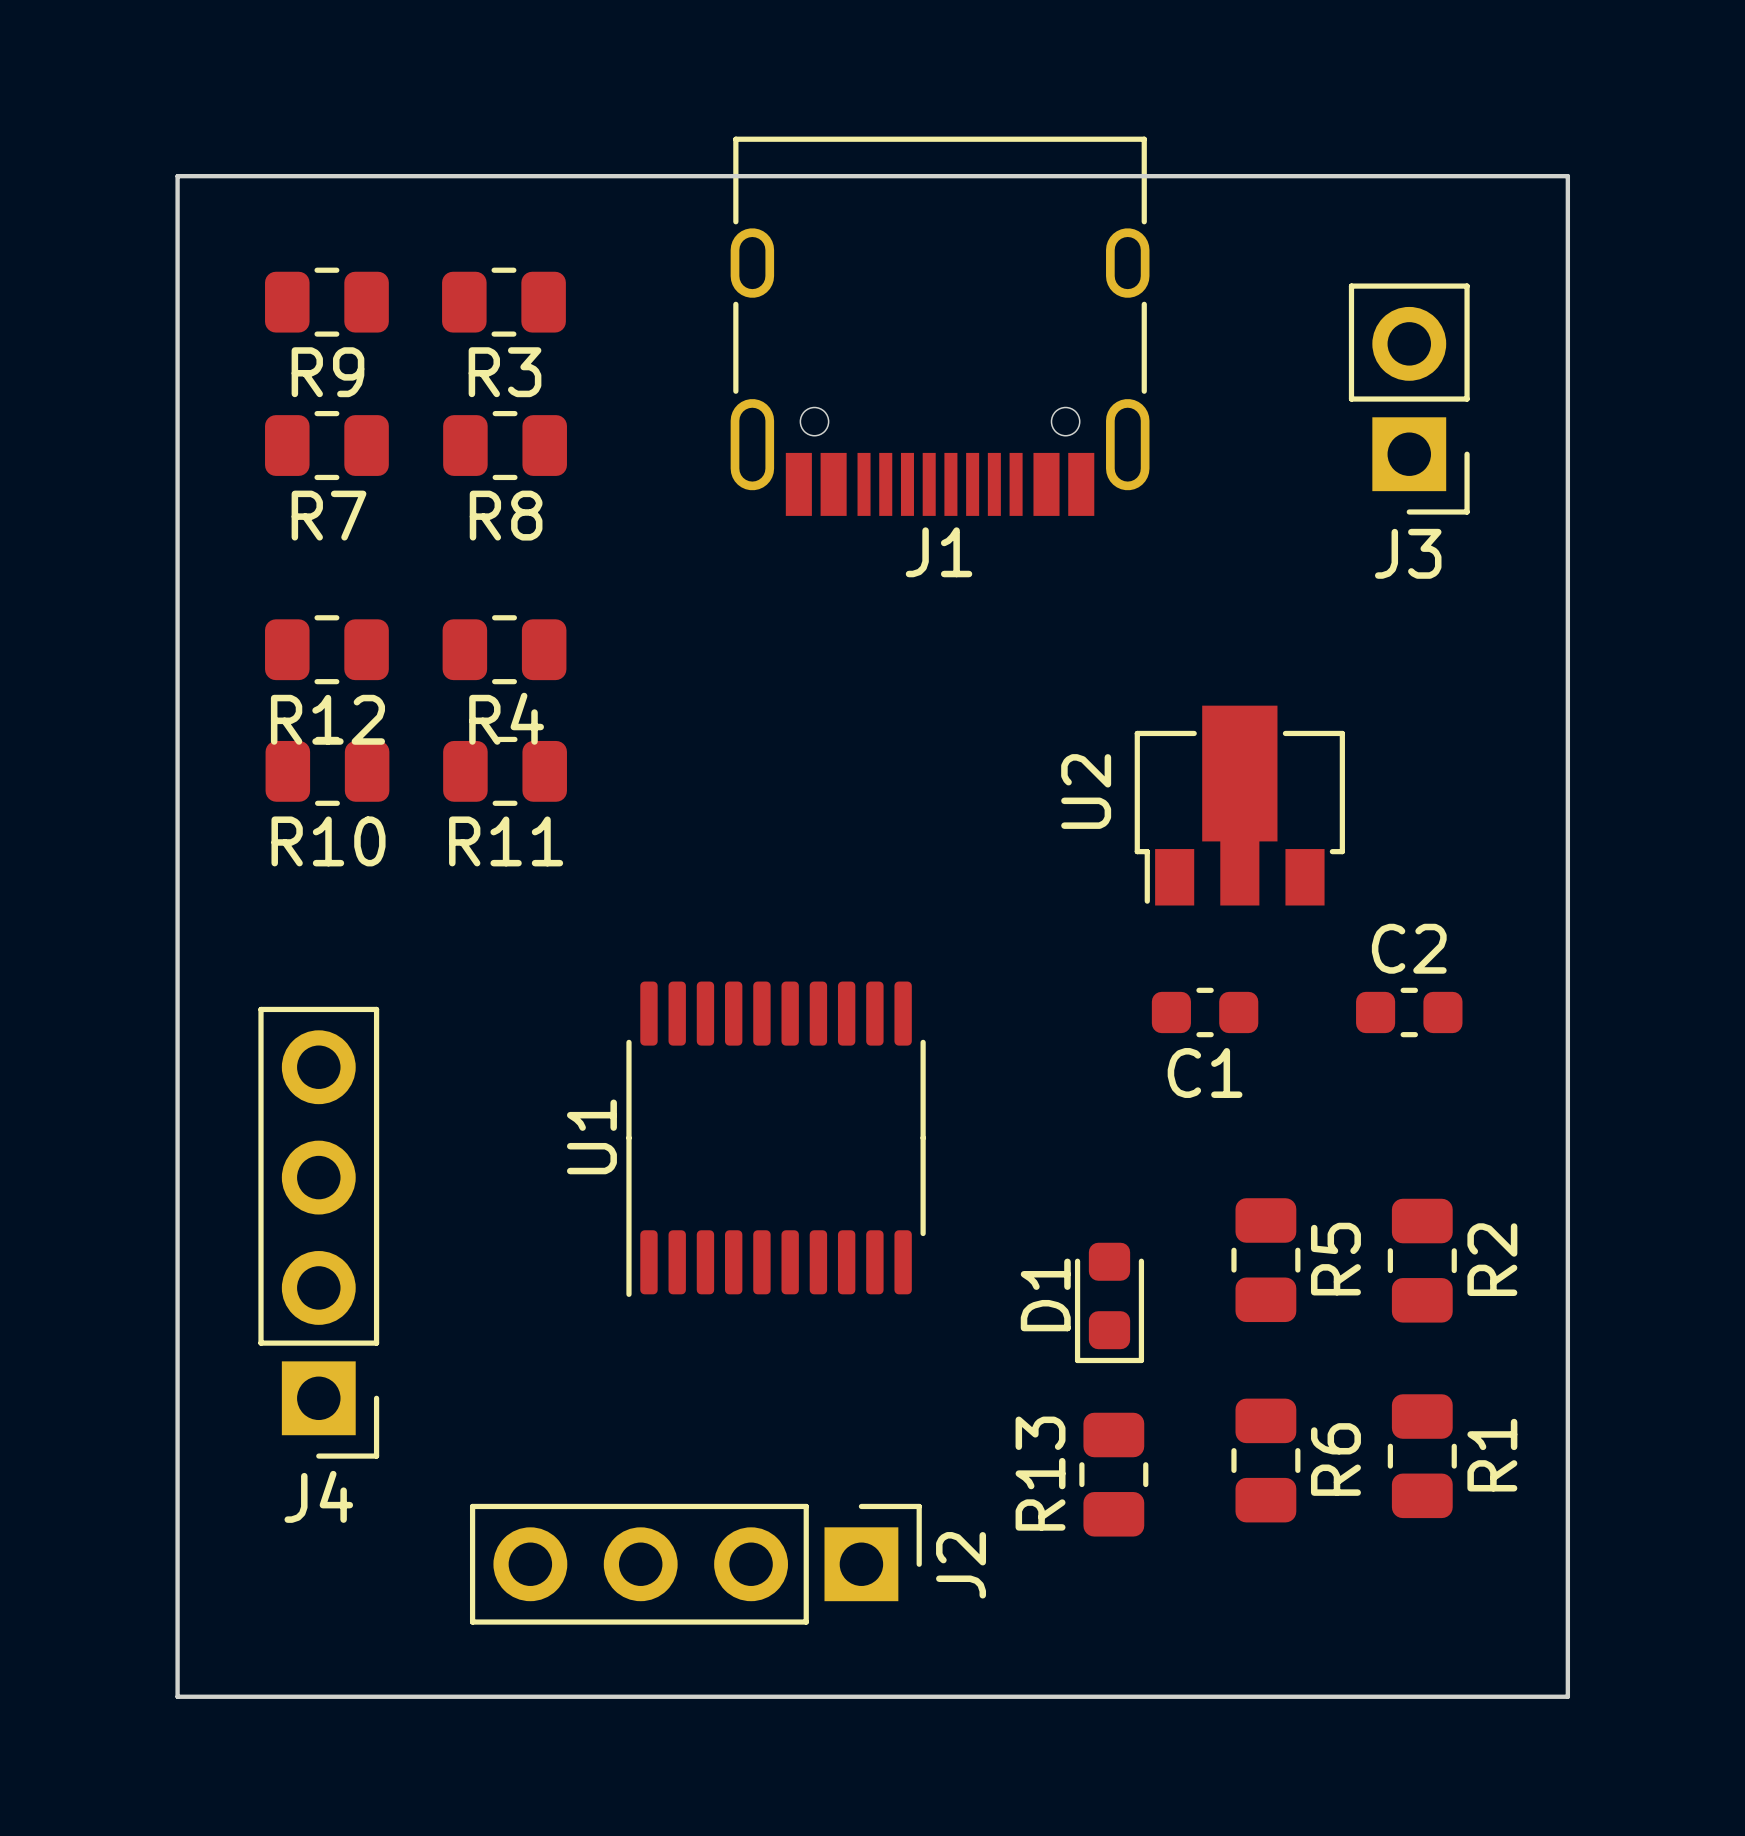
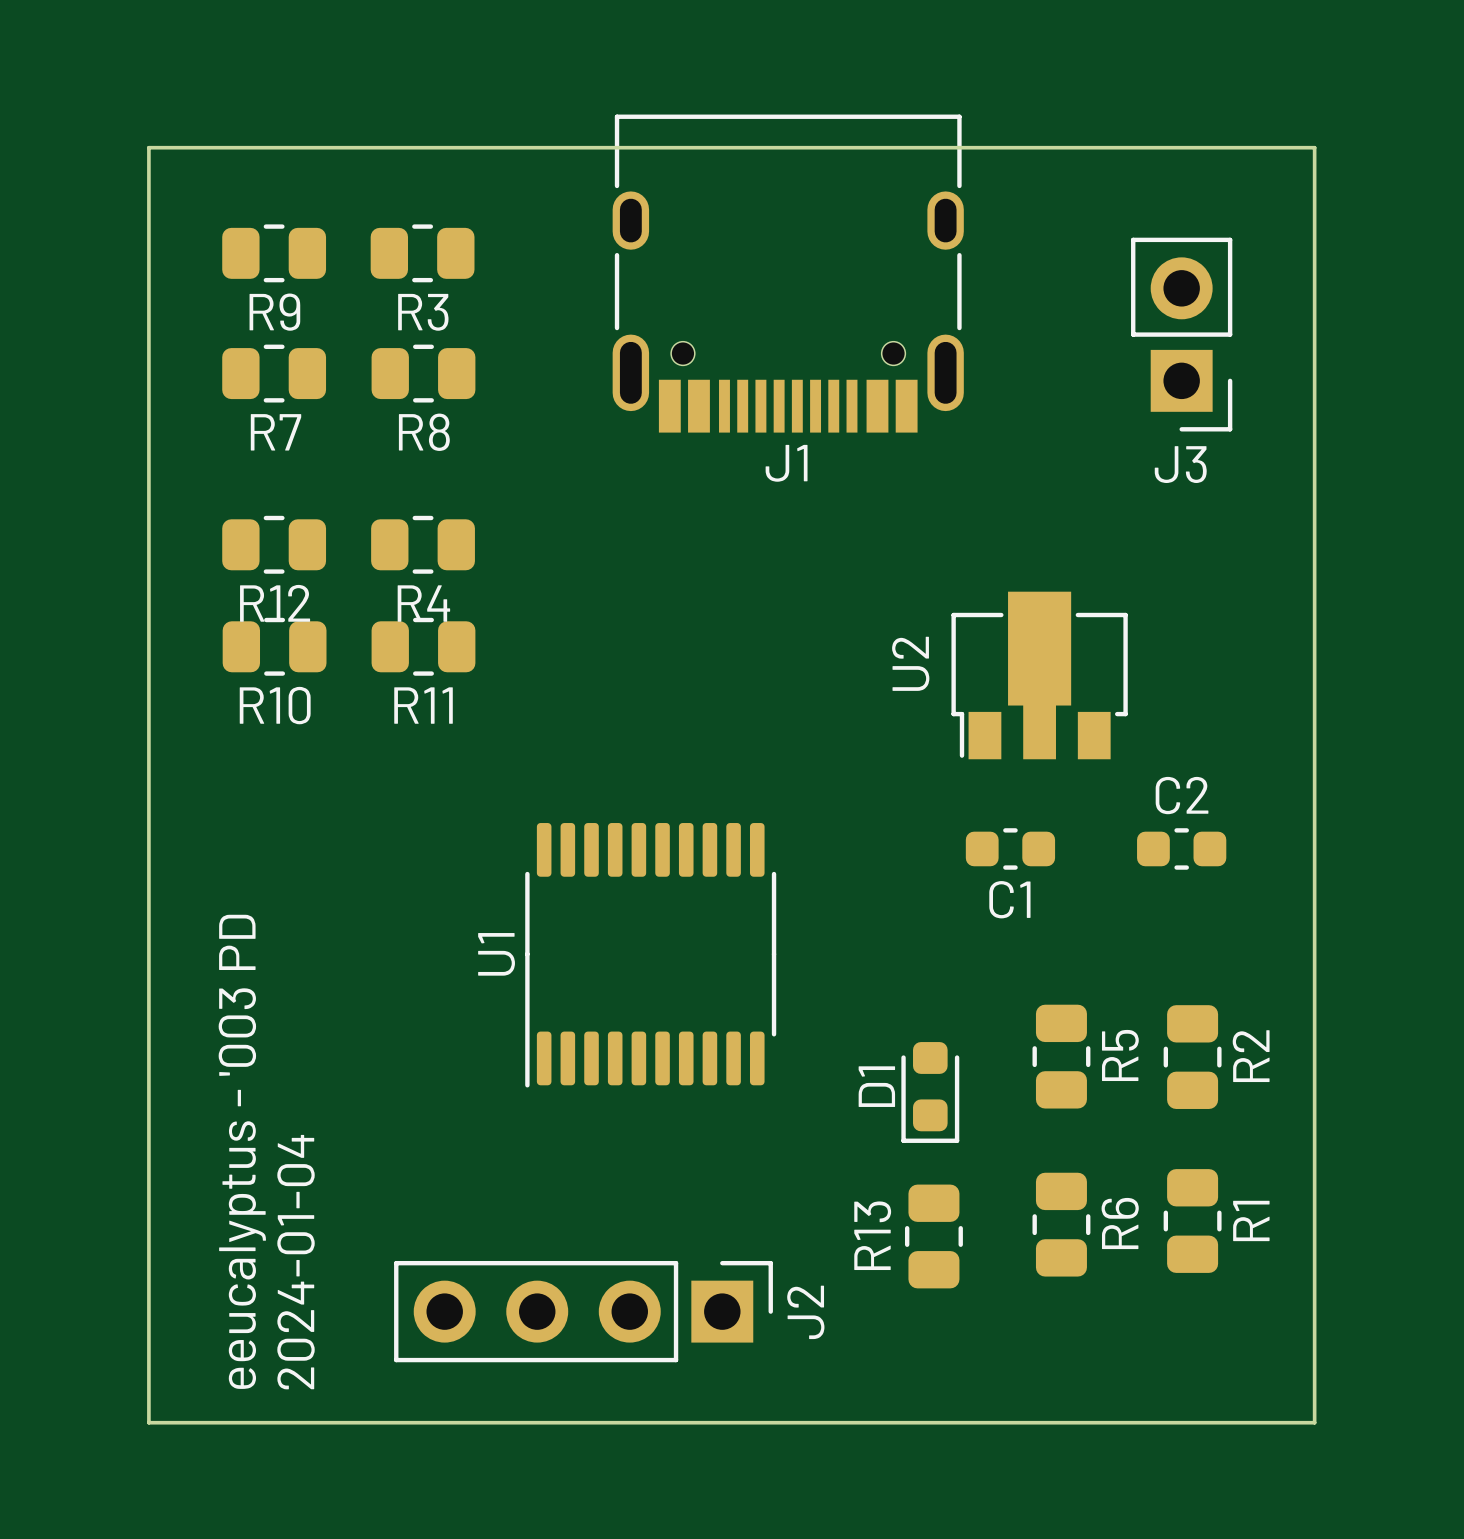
J4: (318, 1232) -> none
text: none -> eeucalyptus - '003 PD (242, 1151)
text: none -> 2024-01-04 (296, 1262)

